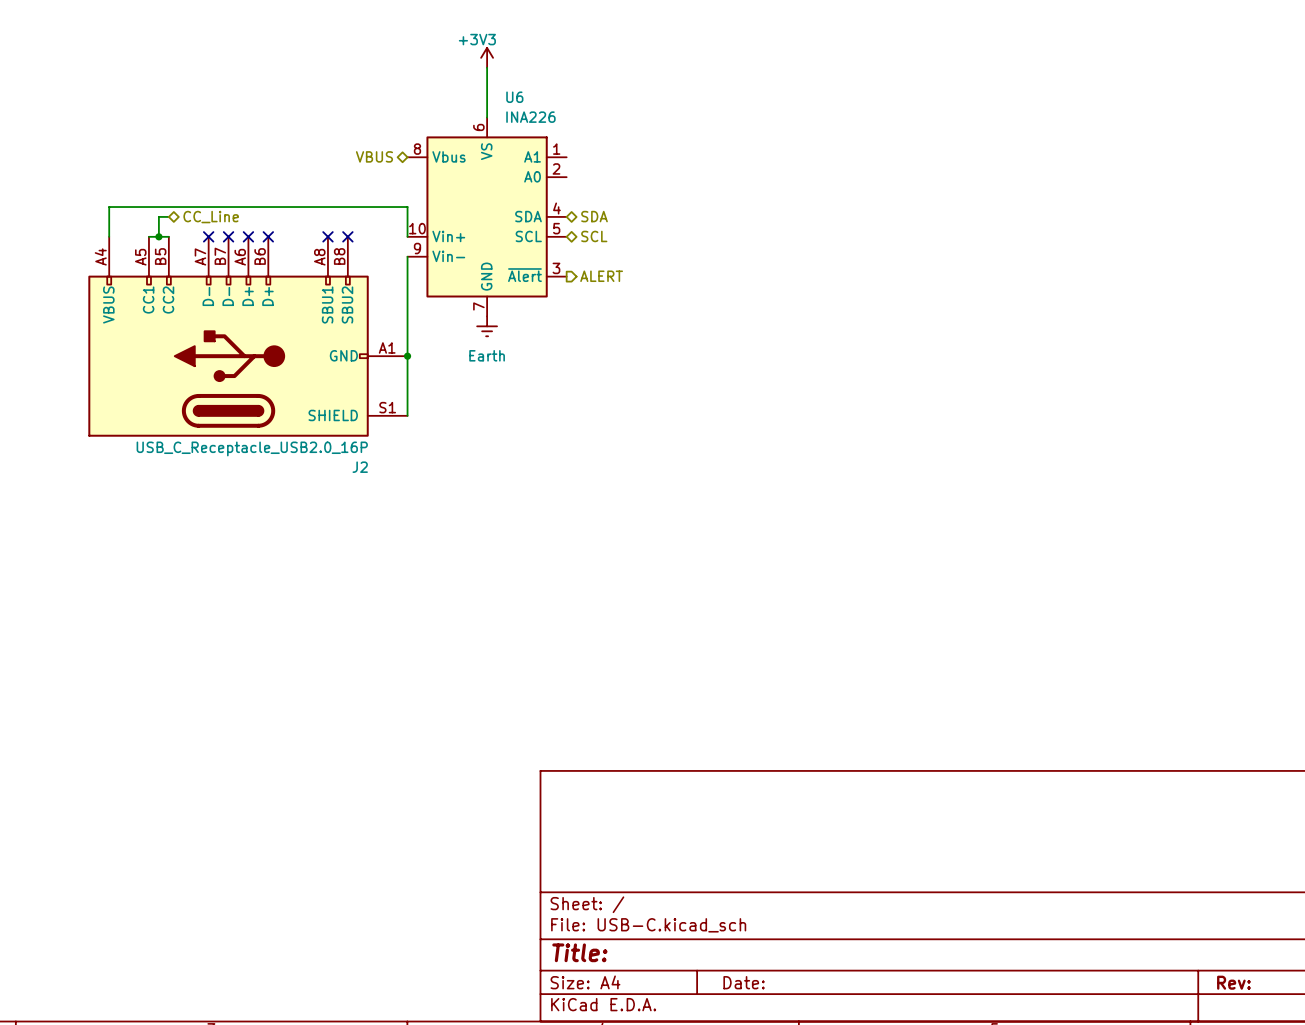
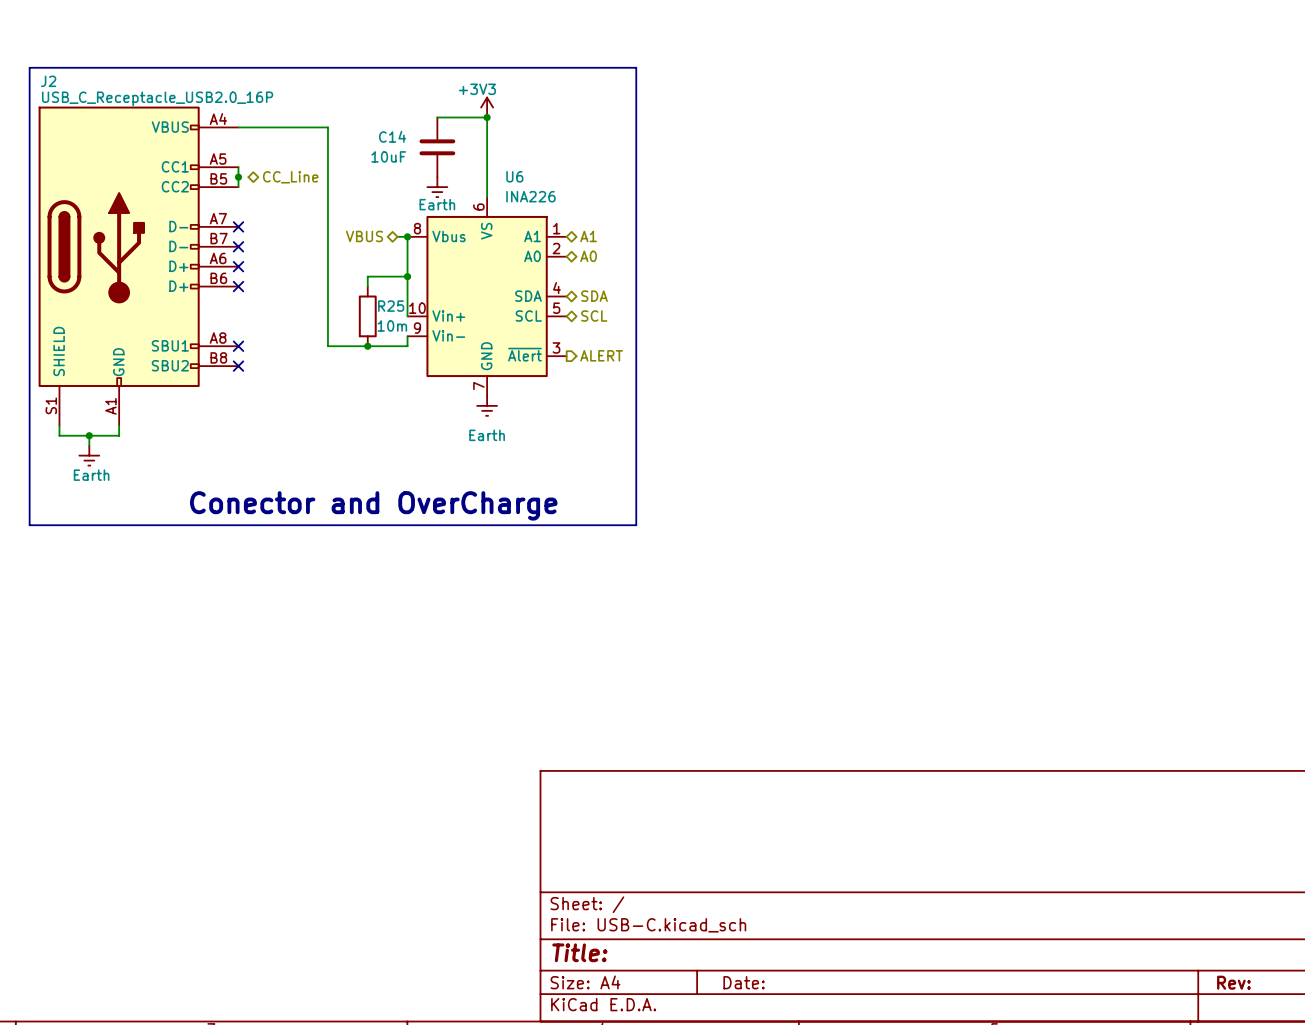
power symbol position: +3V3 (487, 57) -> +3V3 (487, 107)
bus: none -> (29, 67) (636, 67) (636, 525) (29, 525) (29, 67)
wire: (487, 67) (487, 117) -> none
wire: none -> (437, 117) (487, 117) (487, 197)
junction: none -> (487, 117)
C14: none -> 10uF (437, 147)
hierarchical label position: VBUS (374, 156) -> VBUS (364, 236)
wire: none -> (238, 167) (238, 187)
junction: none -> (238, 177)
power symbol: none -> Earth (437, 187)
U6 position: (487, 216) -> (487, 296)
hierarchical label position: SDA (594, 216) -> SDA (594, 296)
hierarchical label position: CC_Line (211, 217) -> CC_Line (290, 177)
no-connect mark: none -> (238, 226)
wire: (109, 236) (109, 207) (407, 207) (407, 236) -> none
junction: (158, 236) -> none
no-connect mark: (208, 236) -> none
no-connect mark: (228, 236) -> none
no-connect mark: (248, 236) -> none
no-connect mark: (268, 236) -> none
no-connect mark: (327, 236) -> none
no-connect mark: (347, 236) -> none
wire: none -> (397, 236) (407, 236) (407, 256)
junction: none -> (407, 236)
hierarchical label: SCL (594, 236) -> A1 (588, 236)
no-connect mark: none -> (238, 246)
hierarchical label: none -> A0 (588, 256)
no-connect mark: none -> (238, 266)
wire: none -> (407, 276) (367, 276) (367, 286)
junction: none -> (407, 276)
hierarchical label position: ALERT (601, 276) -> ALERT (601, 355)
no-connect mark: none -> (238, 286)
R25: none -> 10m (367, 316)
wire: (407, 316) (407, 336) -> none
hierarchical label: none -> SCL (594, 316)
power symbol: Earth (487, 326) -> none
no-connect mark: none -> (238, 346)
junction: none -> (367, 346)
wire: (407, 346) (407, 415) -> (407, 346) (327, 346) (327, 127) (238, 127)
J2 rotation: 0° (228, 356) -> 90° clockwise (119, 246)
junction: (407, 356) -> none
no-connect mark: none -> (238, 366)
power symbol: none -> Earth (487, 405)
wire: none -> (59, 425) (59, 435) (119, 435) (119, 425)
wire: none -> (89, 435) (89, 445)
junction: none -> (89, 435)
J2 value position: USB_C_Receptacle_USB2.0_16P (252, 448) -> USB_C_Receptacle_USB2.0_16P (157, 98)
power symbol: none -> Earth (89, 455)
J2 name position: J2 (360, 467) -> J2 (48, 81)
text: none -> Conector and OverCharge (373, 505)

